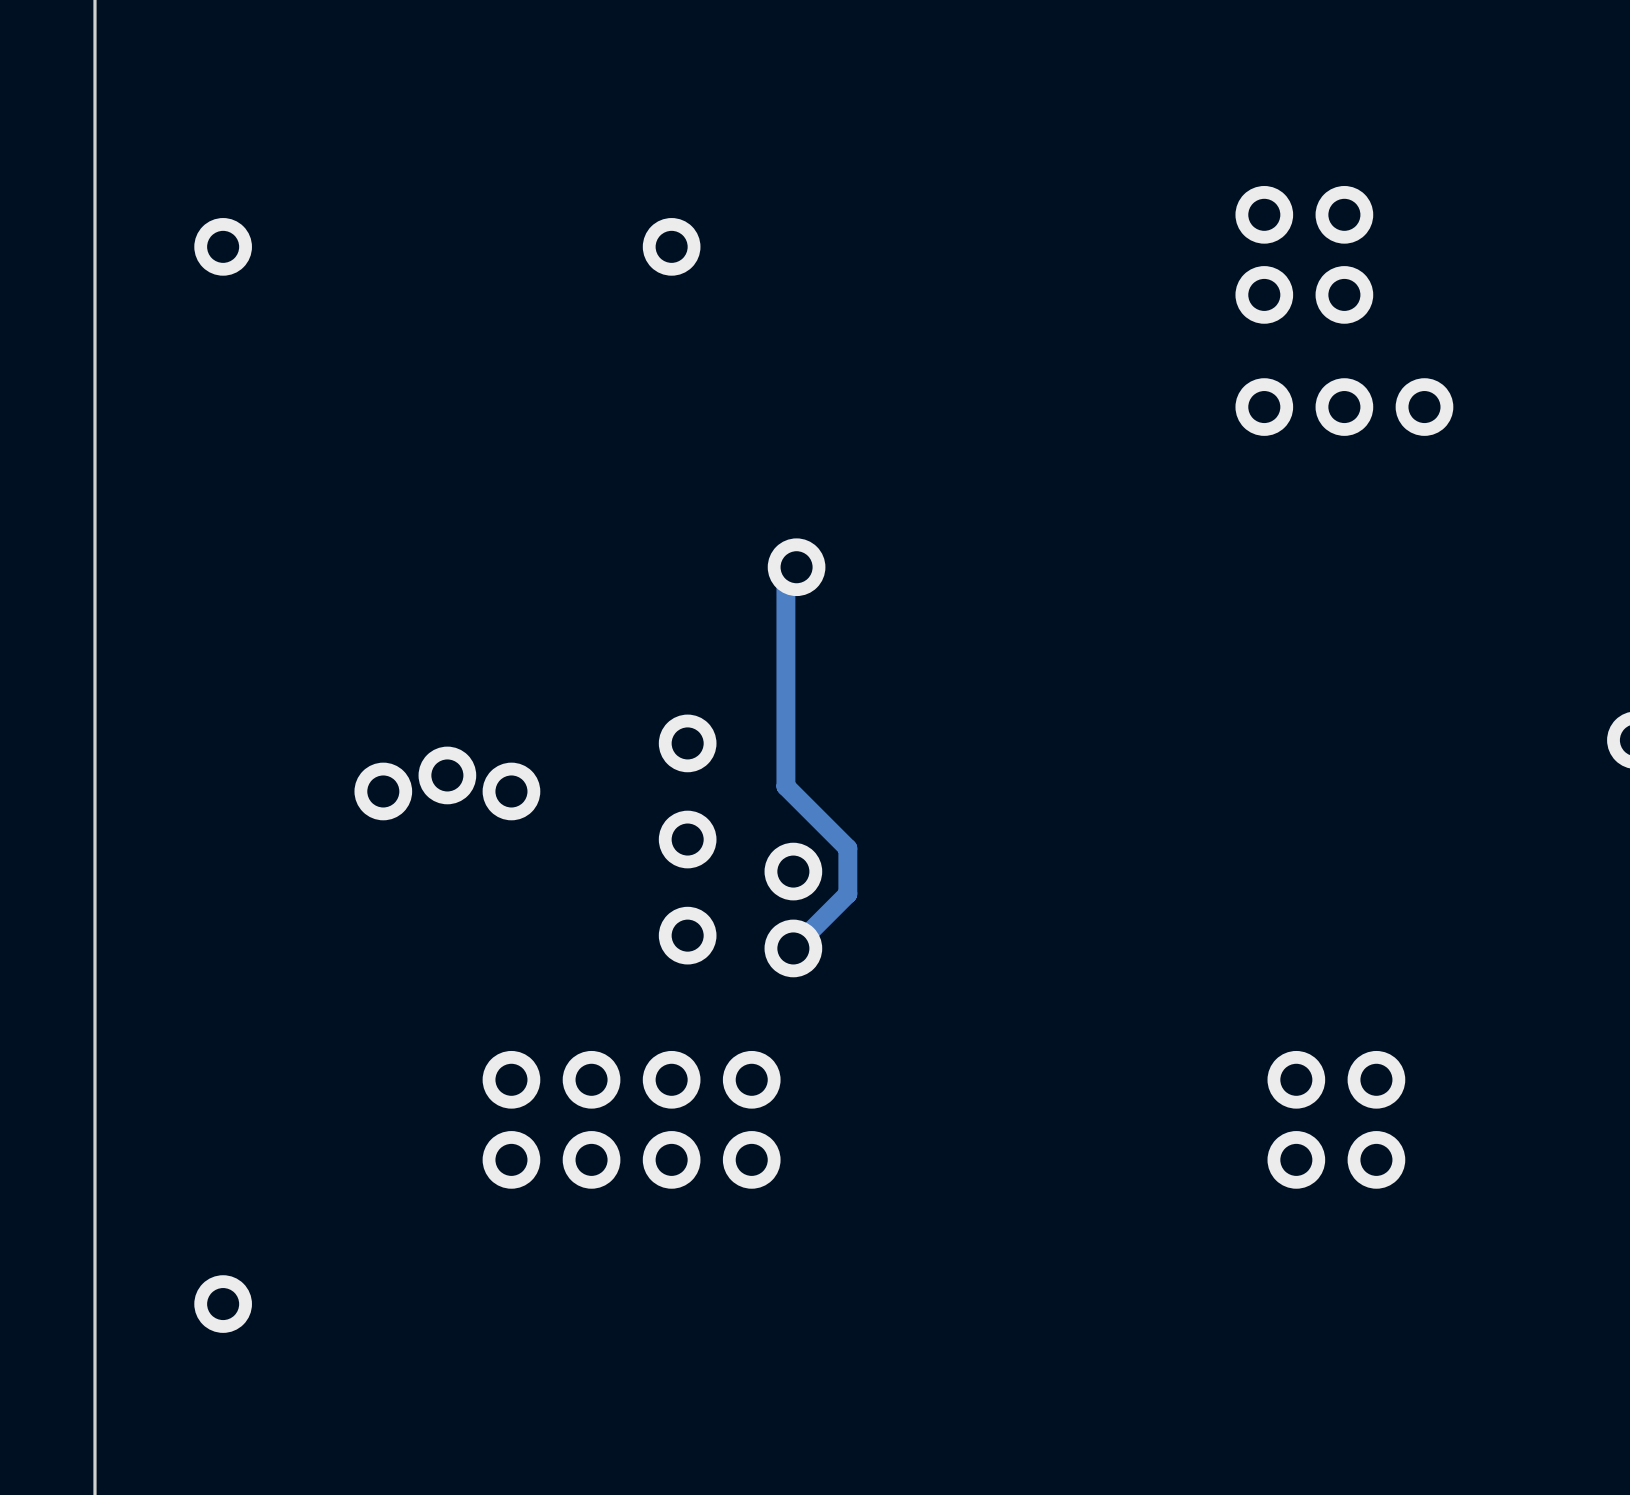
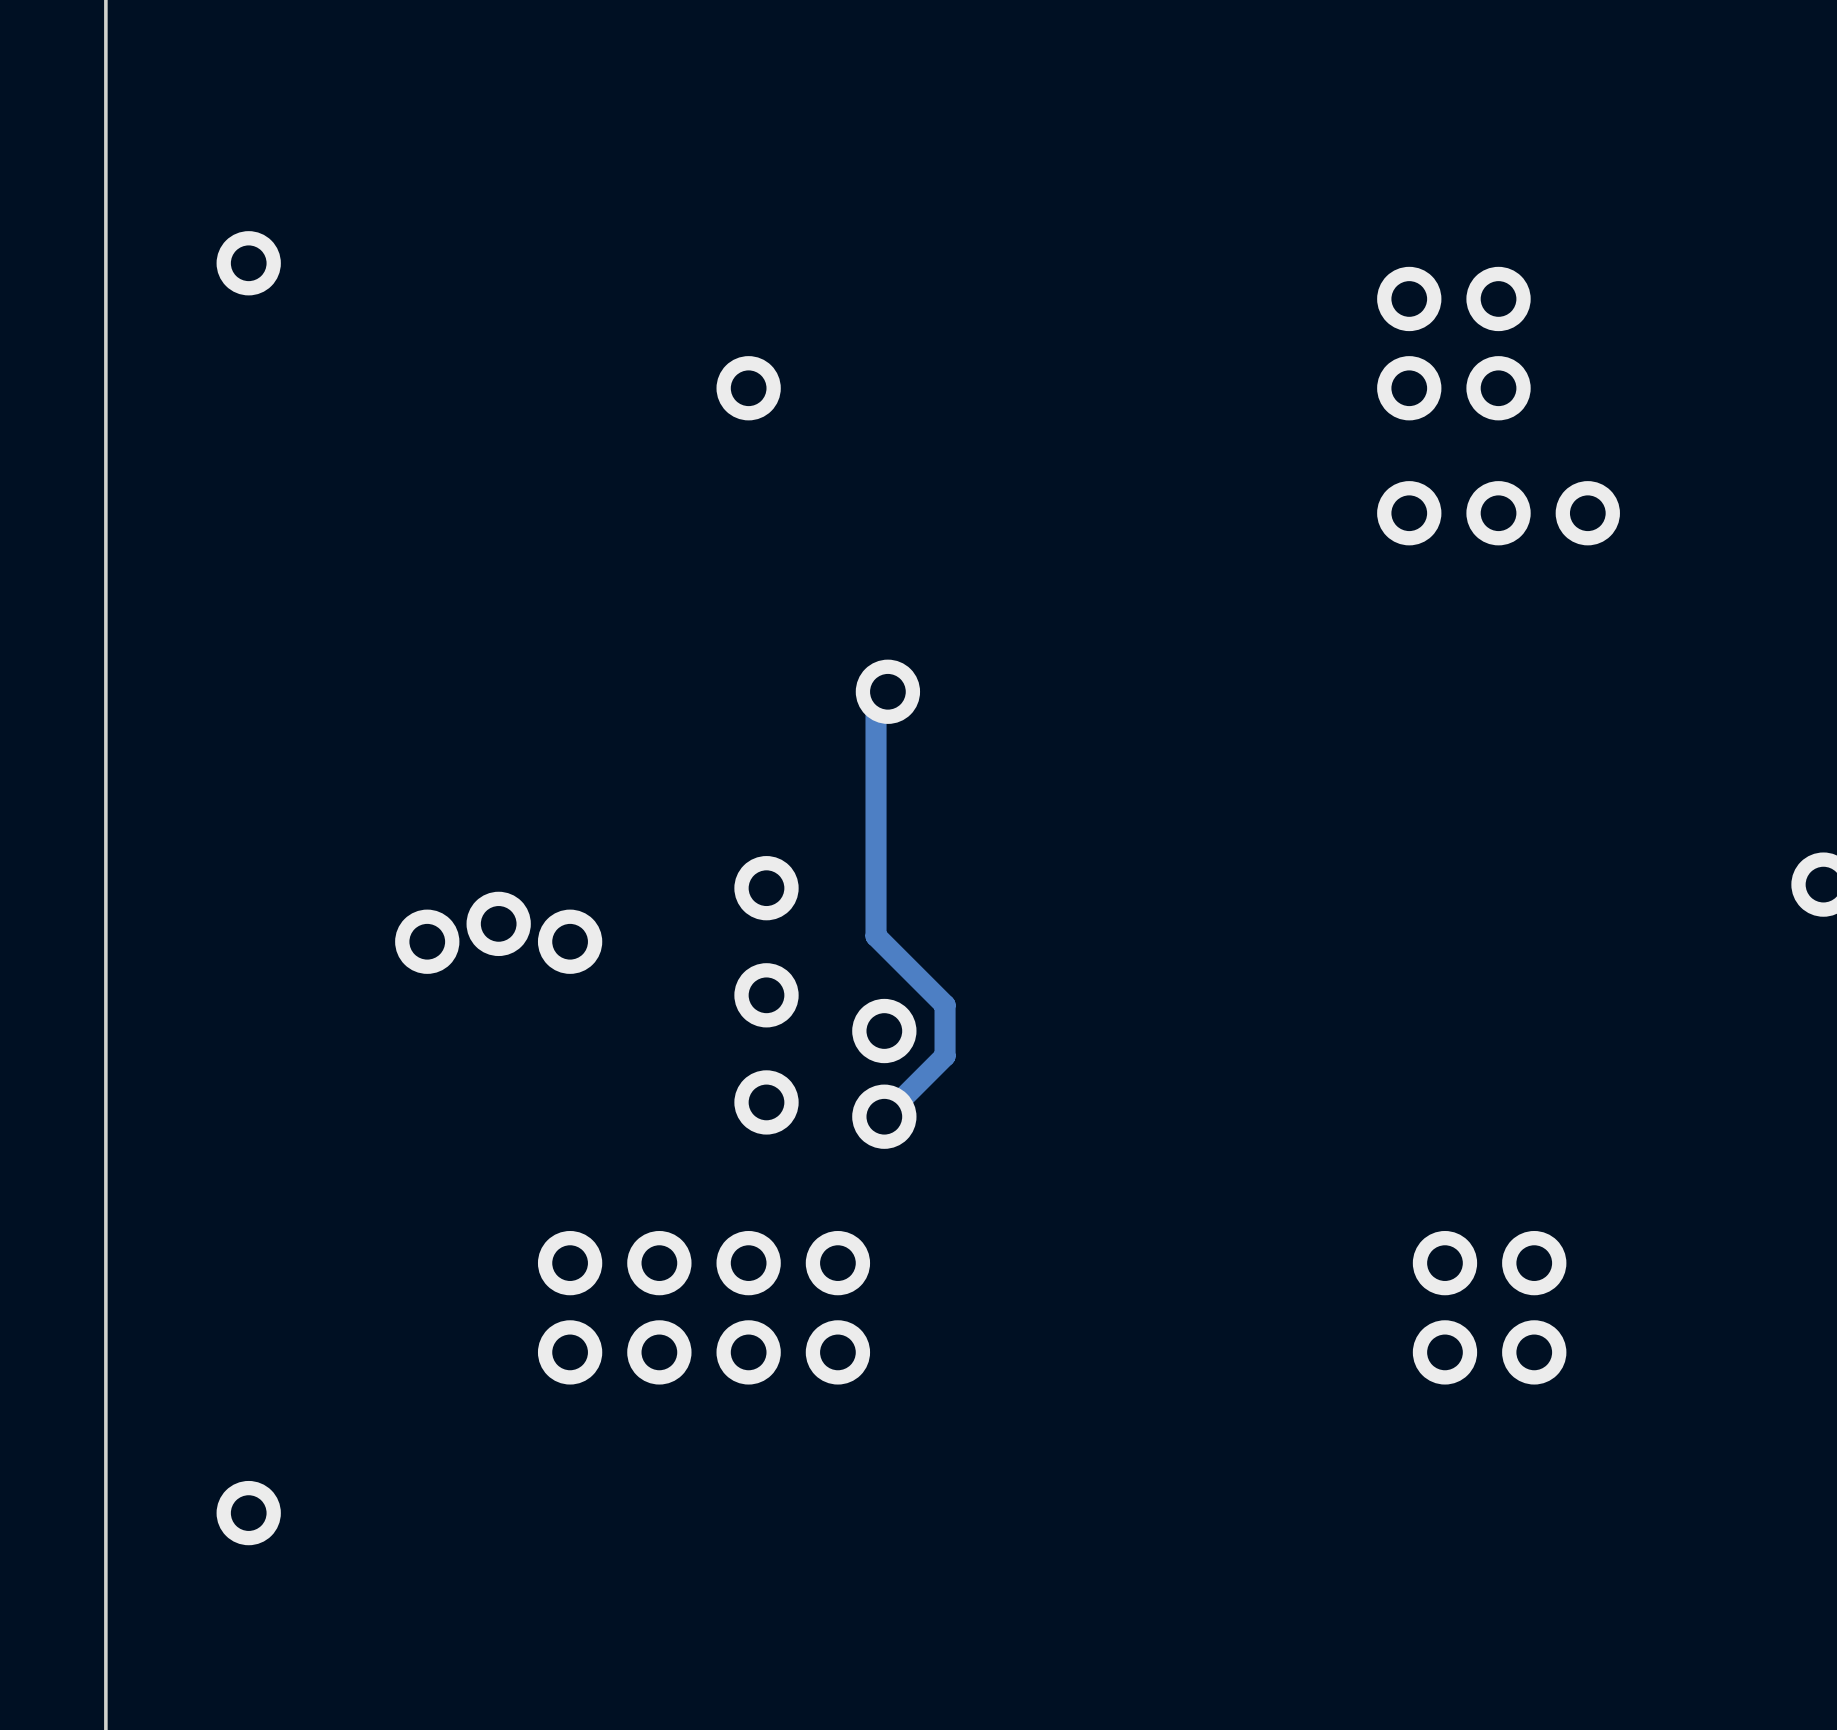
via position: (223, 246) -> (248, 263)
via position: (671, 246) -> (748, 388)

